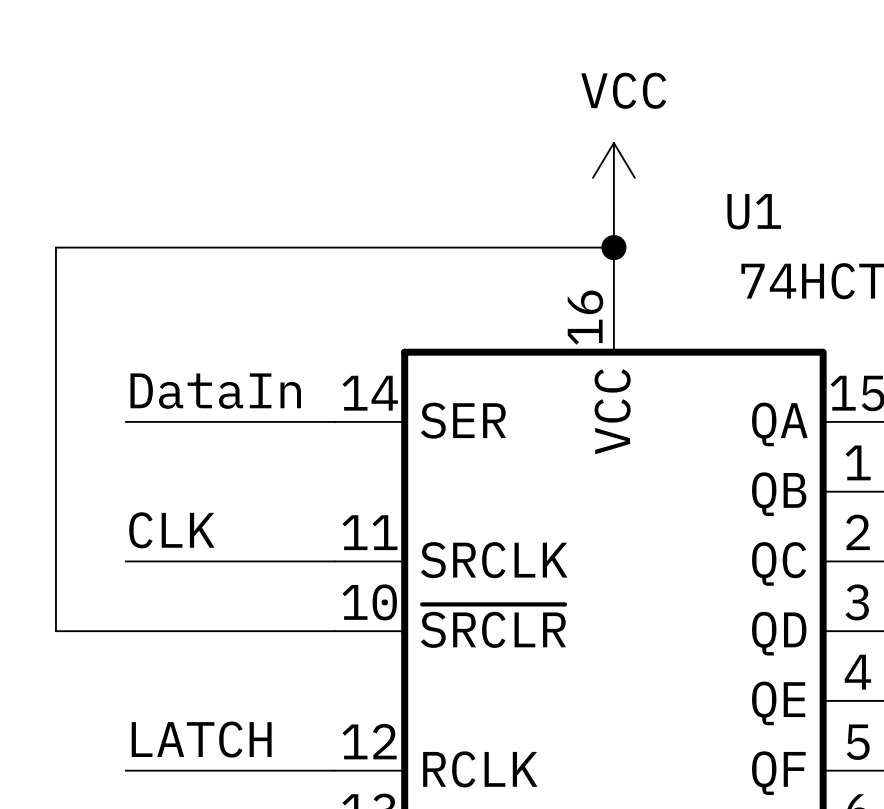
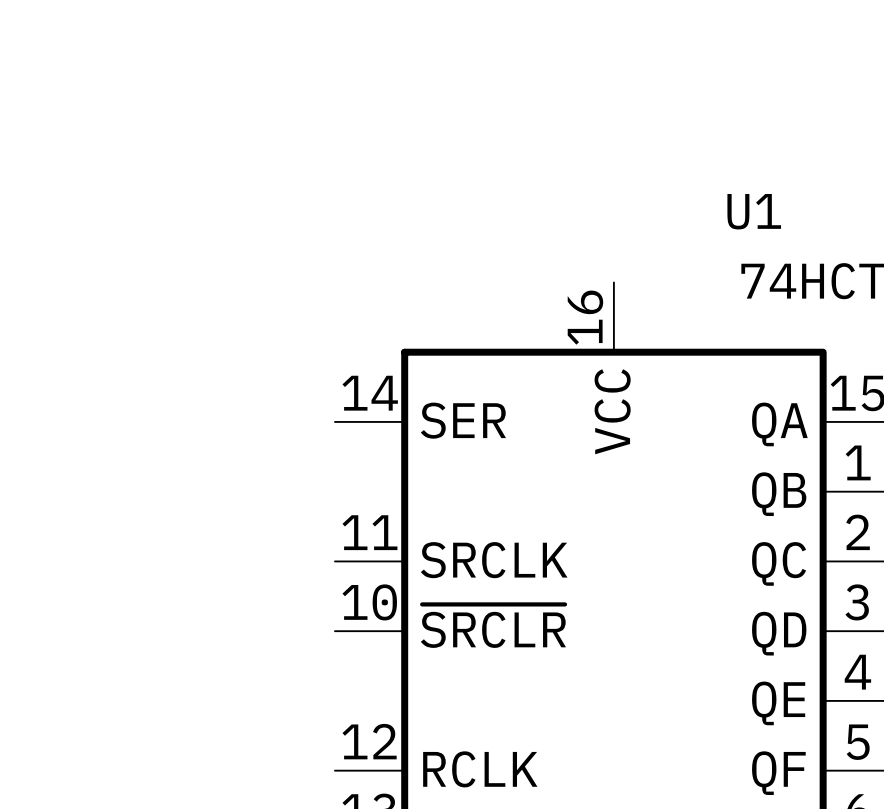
power symbol: VCC (613, 177) -> none
wire: (613, 212) (613, 282) -> none
wire: (613, 247) (55, 247) (55, 631) (334, 631) -> none
junction: (613, 247) -> none
label: DataIn (215, 391) -> none
wire: (125, 421) (334, 421) -> none
label: CLK (171, 530) -> none
wire: (125, 561) (334, 561) -> none
label: LATCH (201, 739) -> none
wire: (125, 770) (334, 770) -> none

